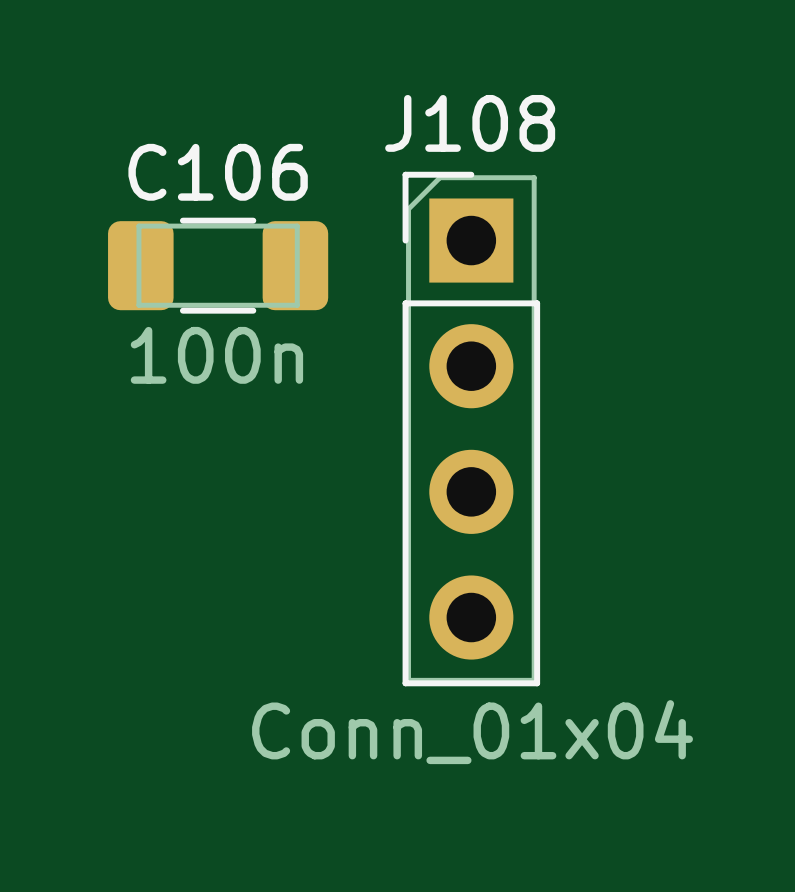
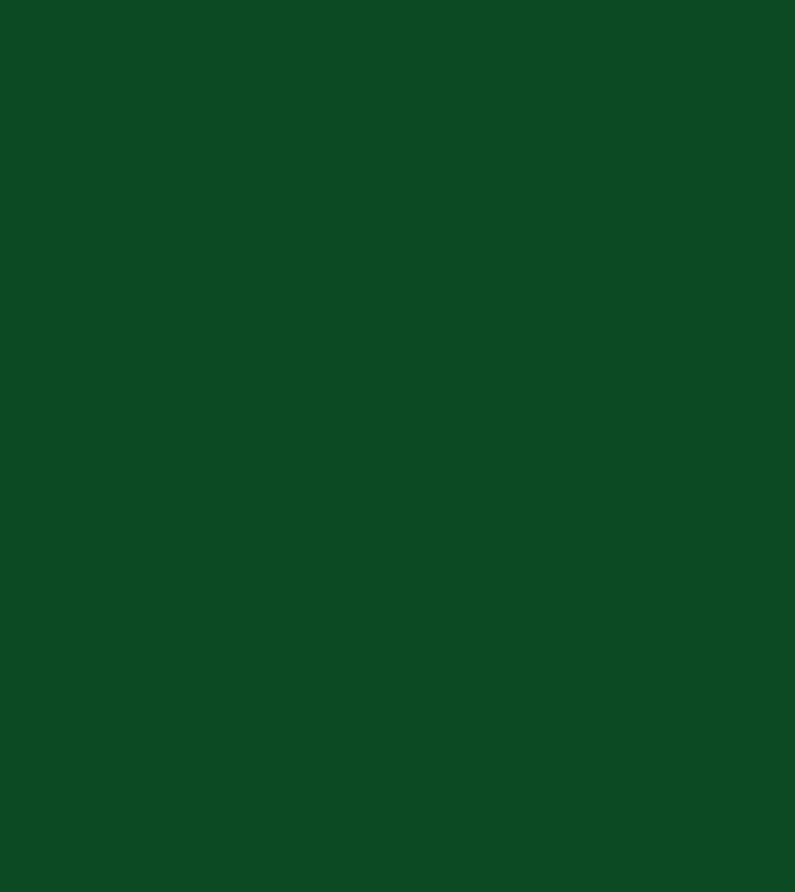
C106: 100n (218, 265) -> none
J108: Conn_01x04 (471, 429) -> none

